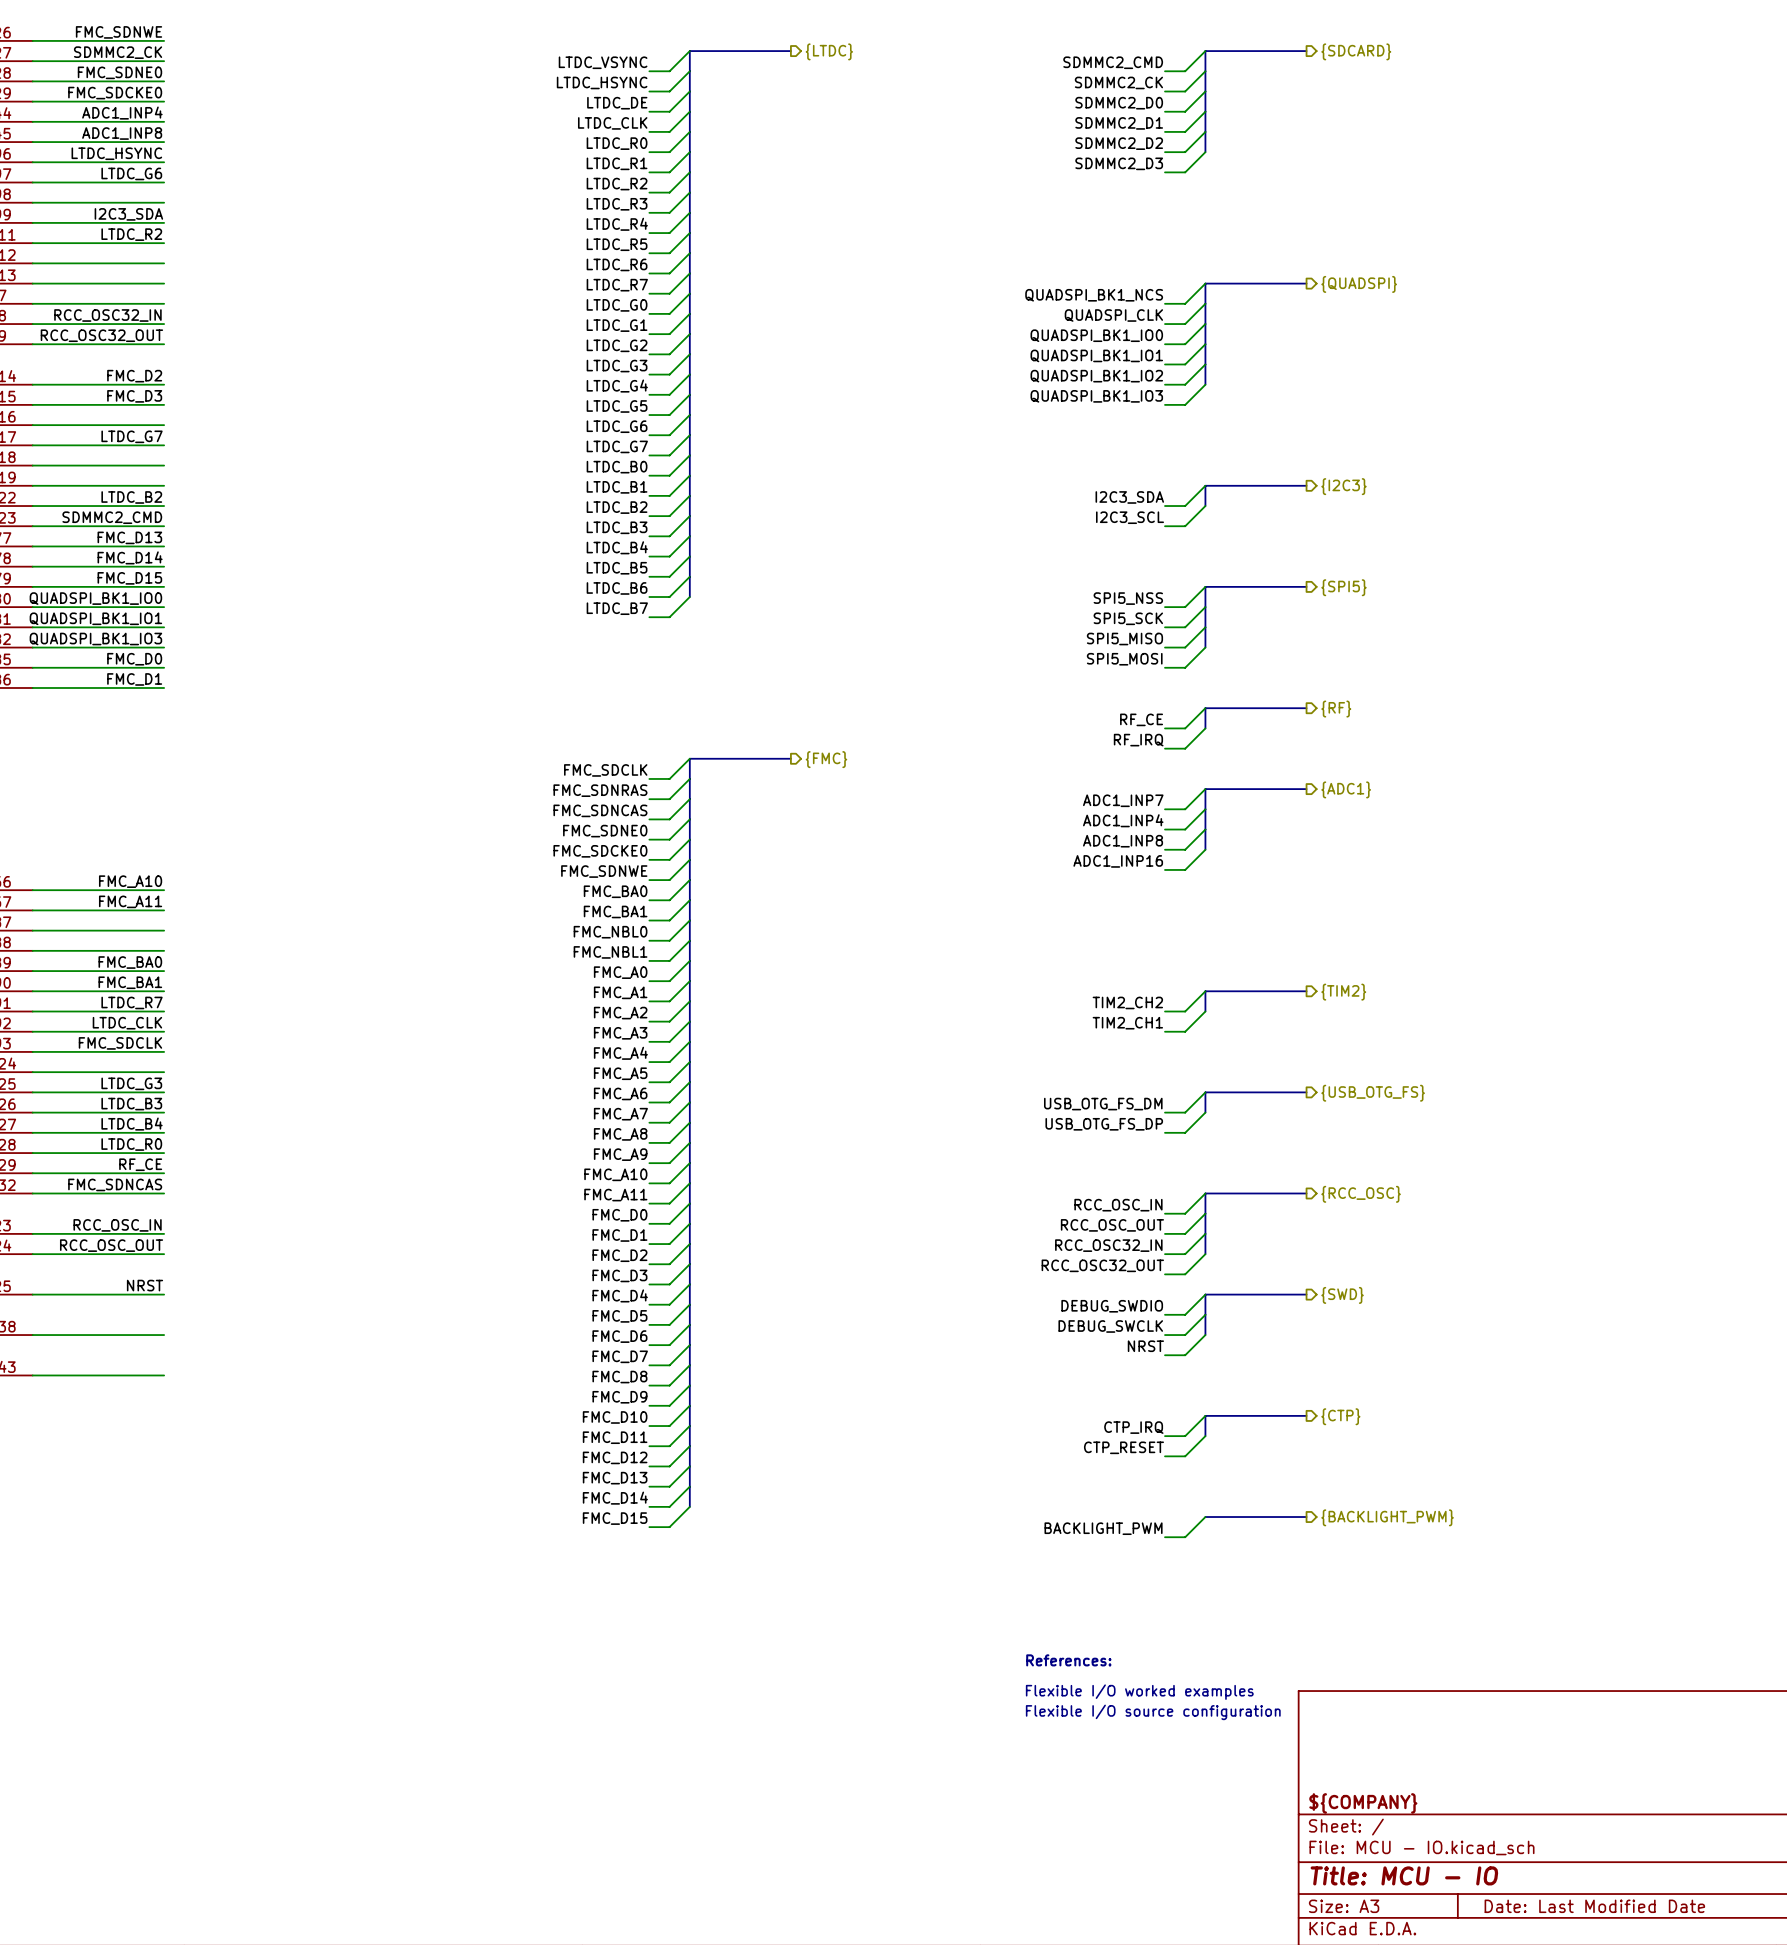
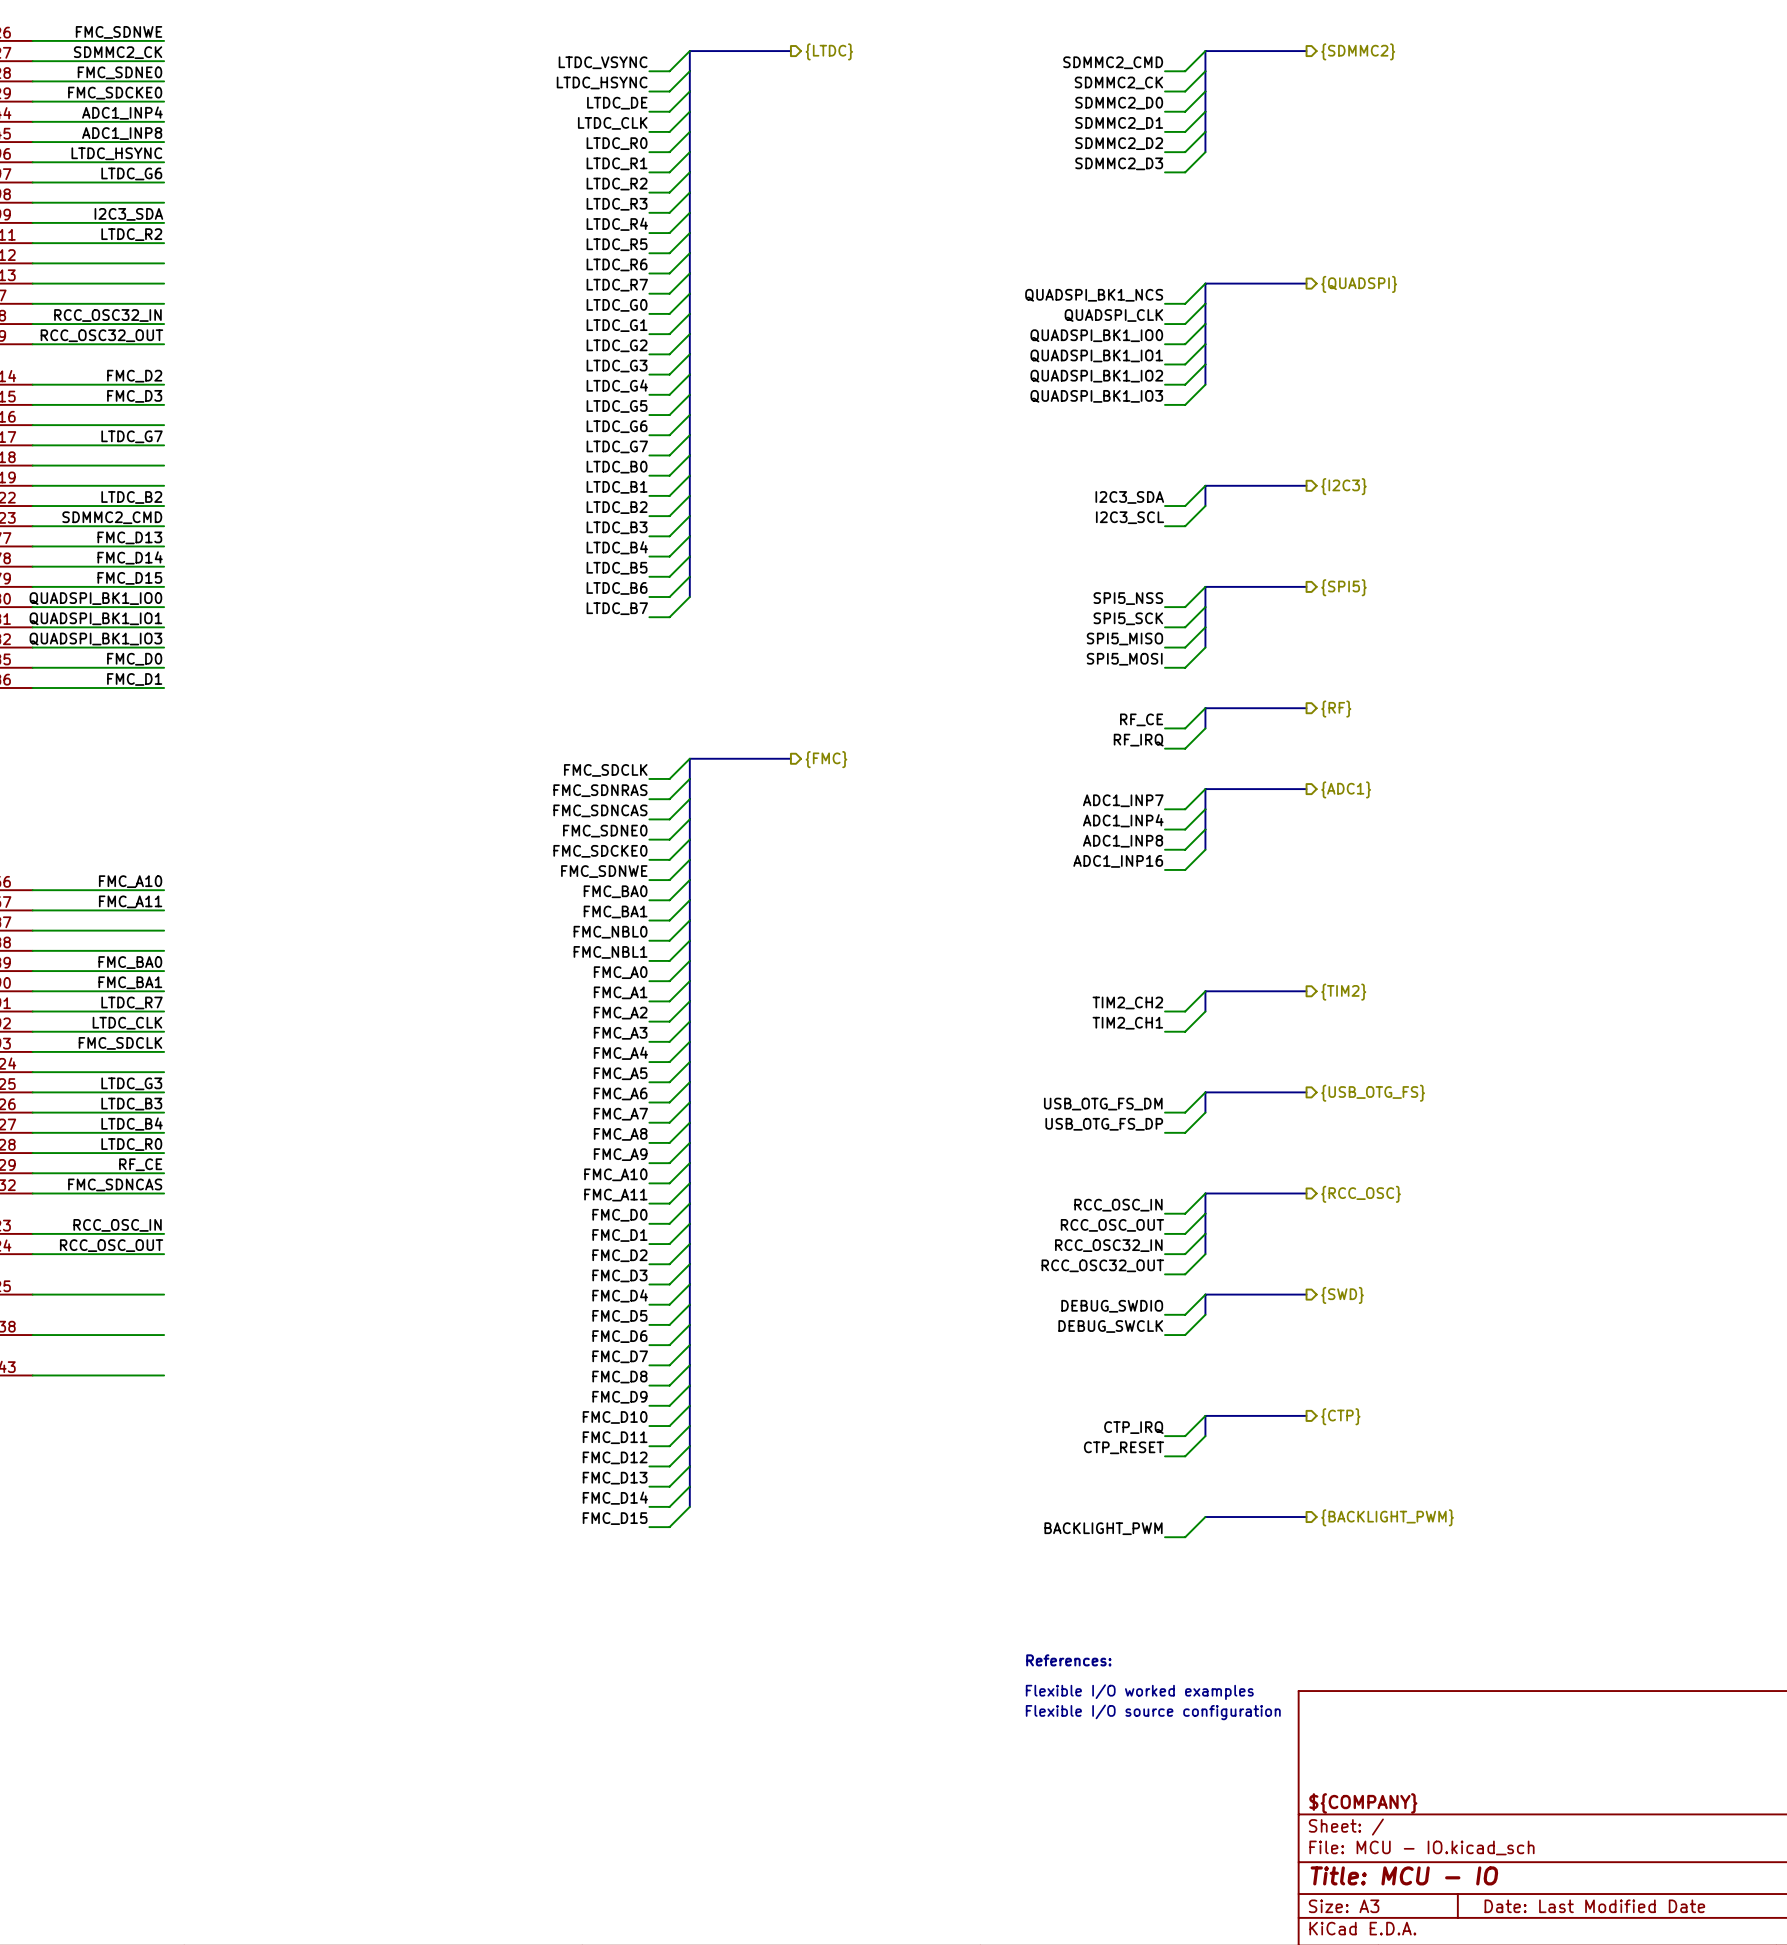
hierarchical label: {SDCARD} (1356, 51) -> {SDMMC2} (1358, 51)
label: NRST (145, 1285) -> none
bus: (1205, 1314) (1205, 1335) -> none
wire: (1205, 1335) (1185, 1355) (1164, 1355) -> none
label: NRST (1145, 1346) -> none

